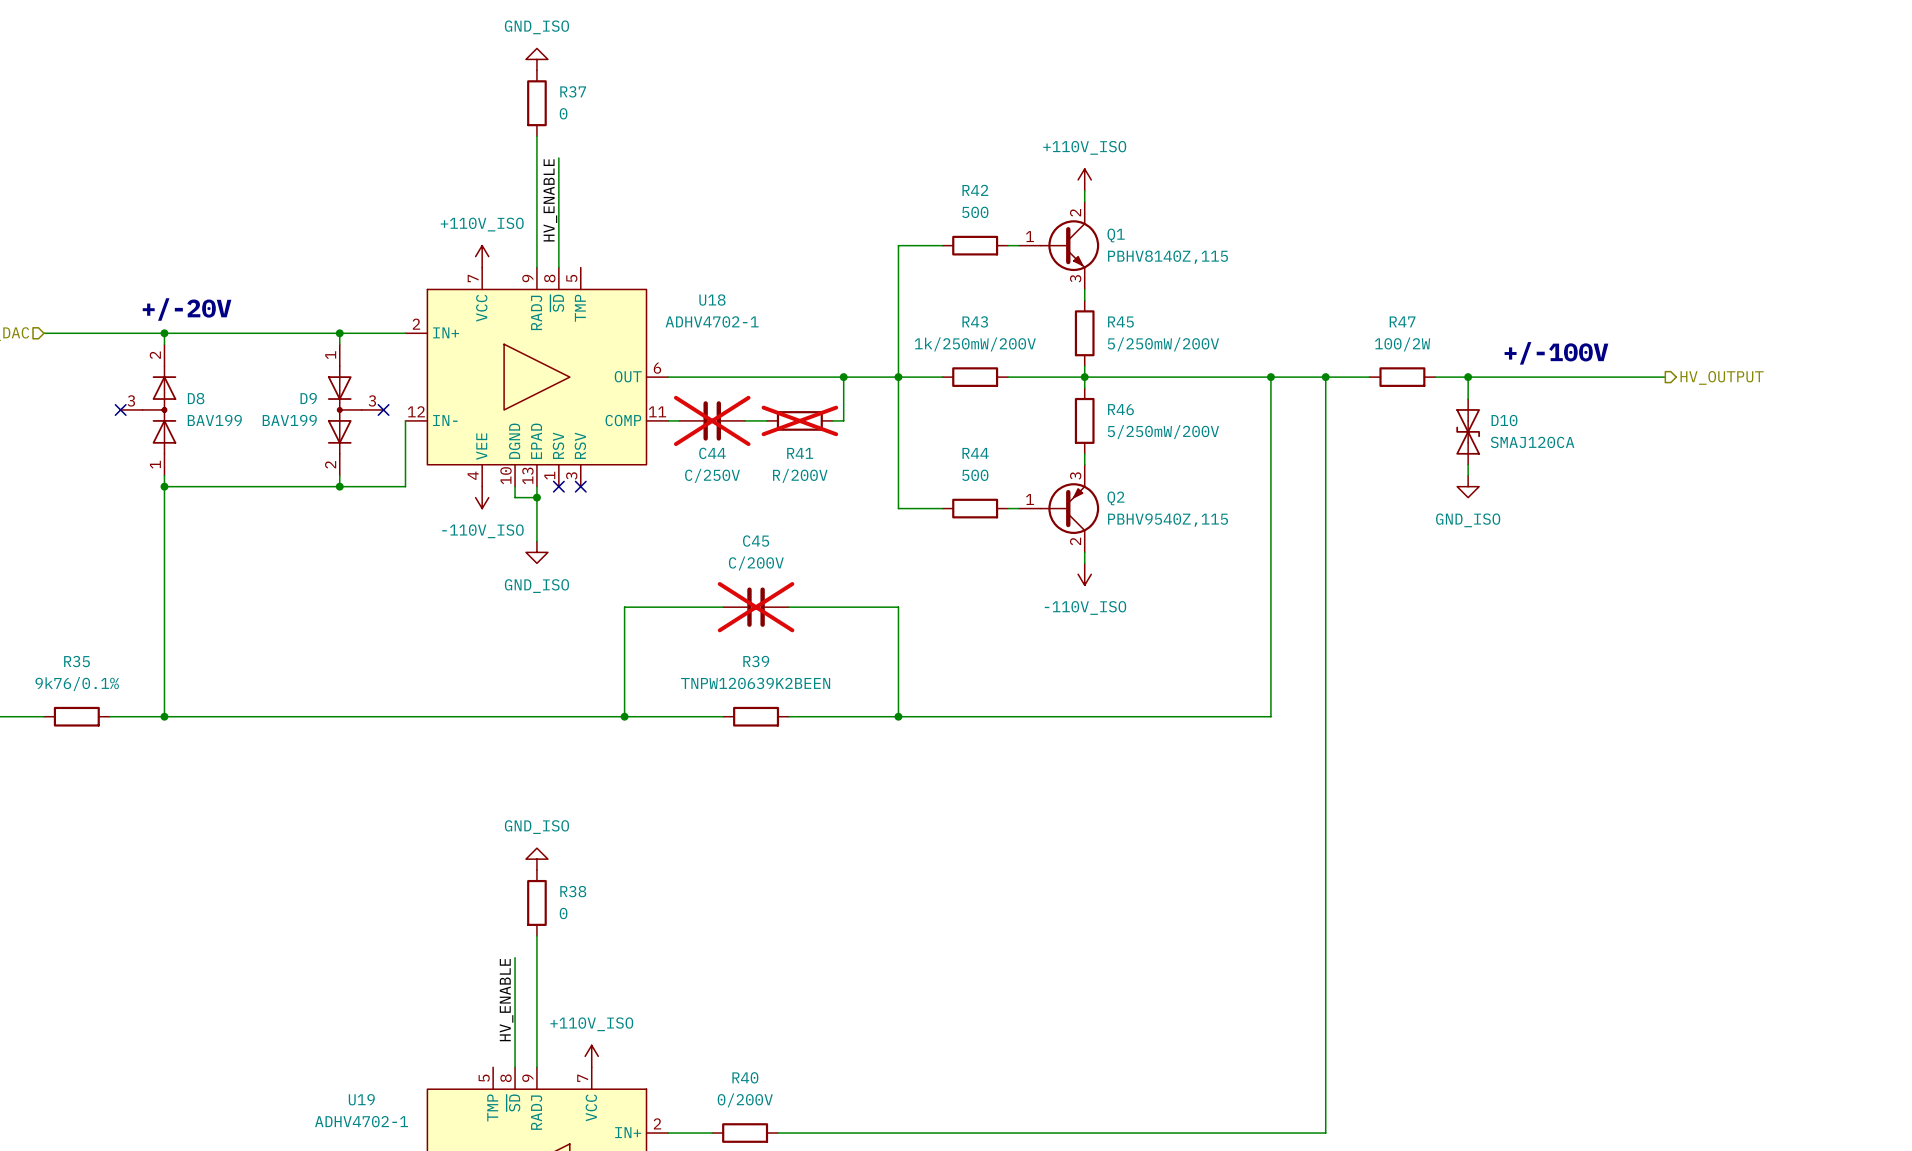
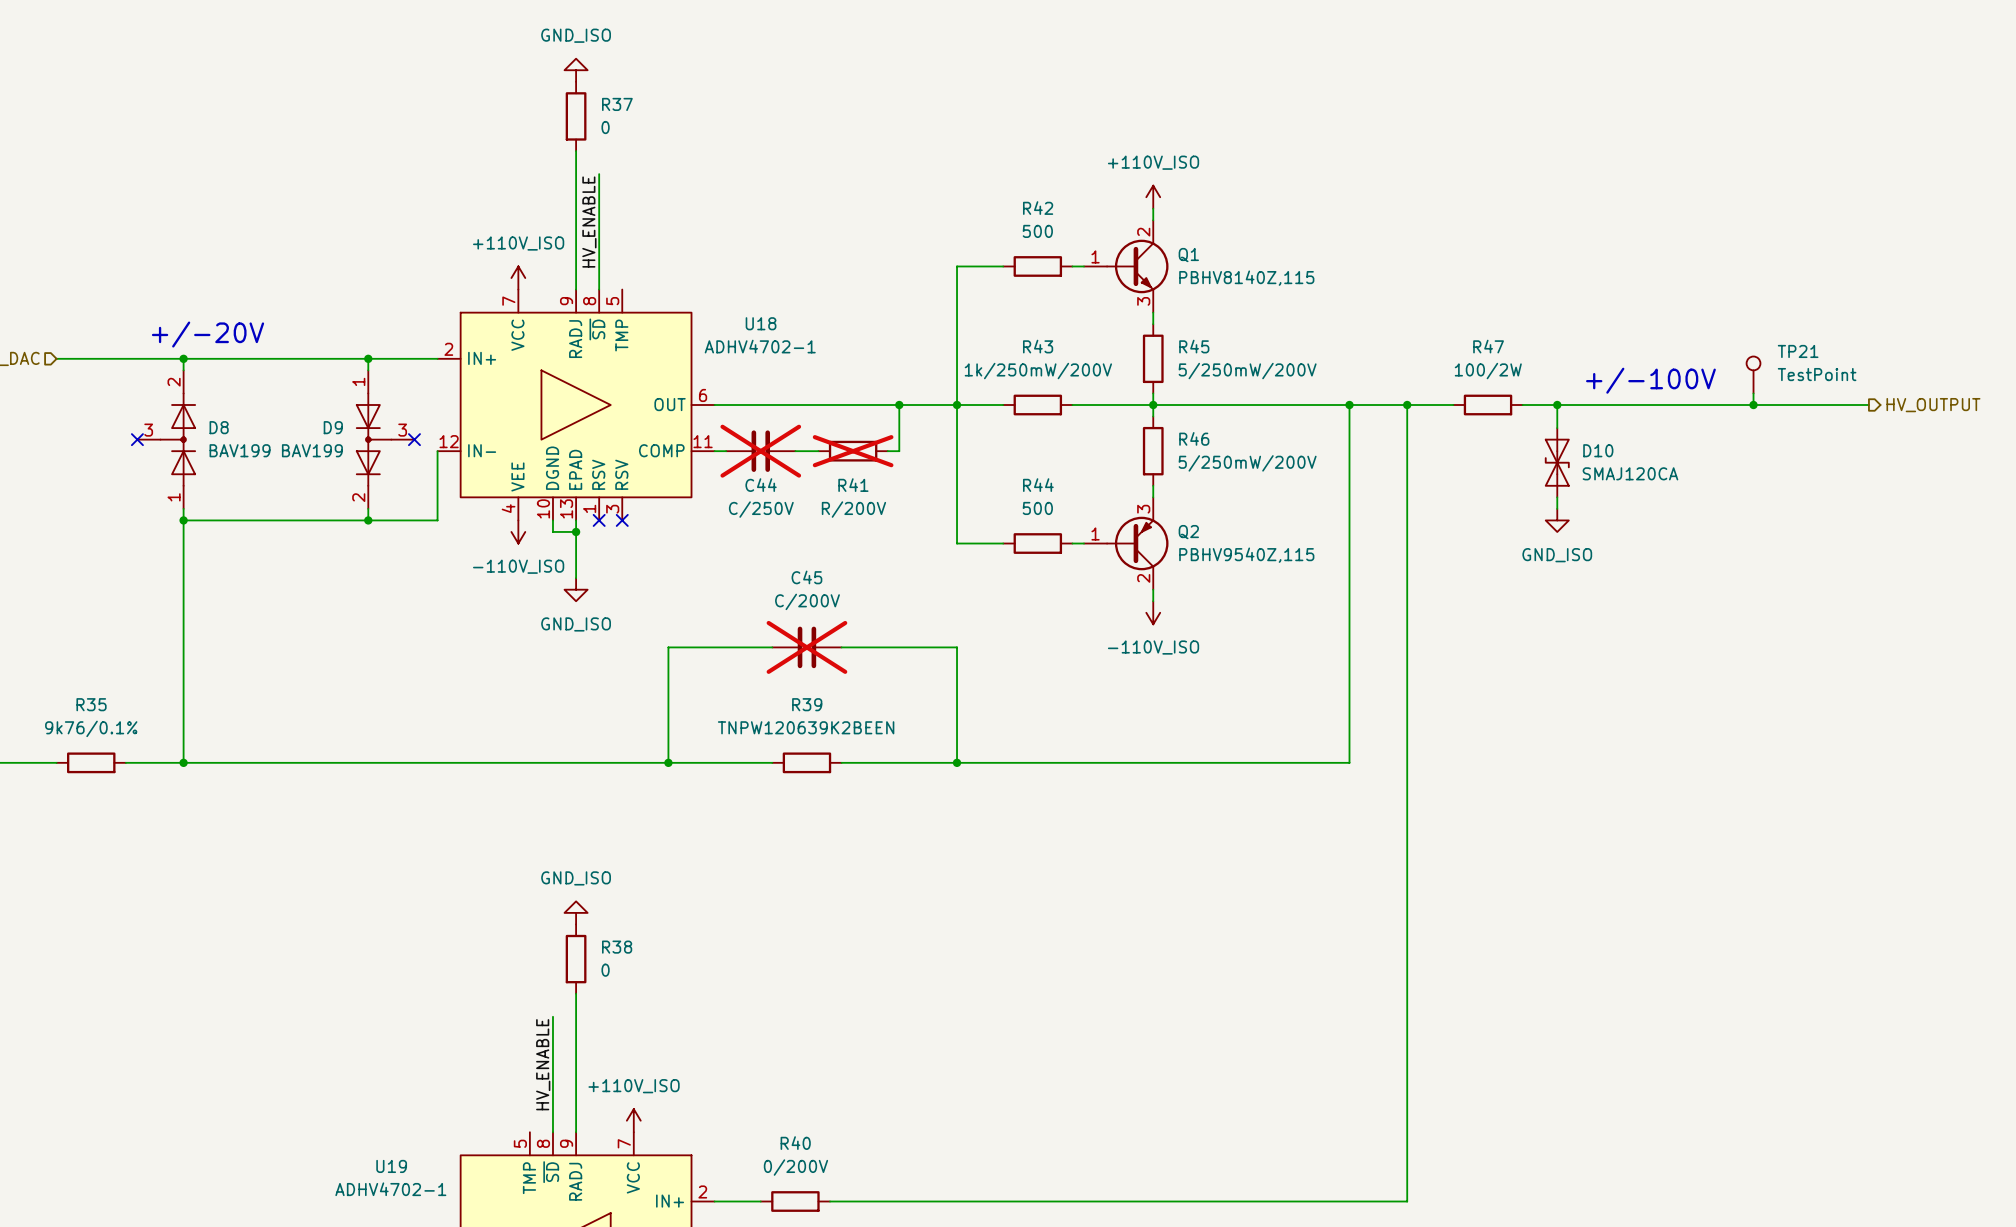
TP21: none -> TestPoint (1753, 374)
wire: none -> (1753, 393) (1753, 405)
junction: none -> (1753, 405)
wire: none -> (1765, 405) (1868, 405)
hierarchical label position: HV_OUTPUT (1722, 377) -> HV_OUTPUT (1933, 405)

